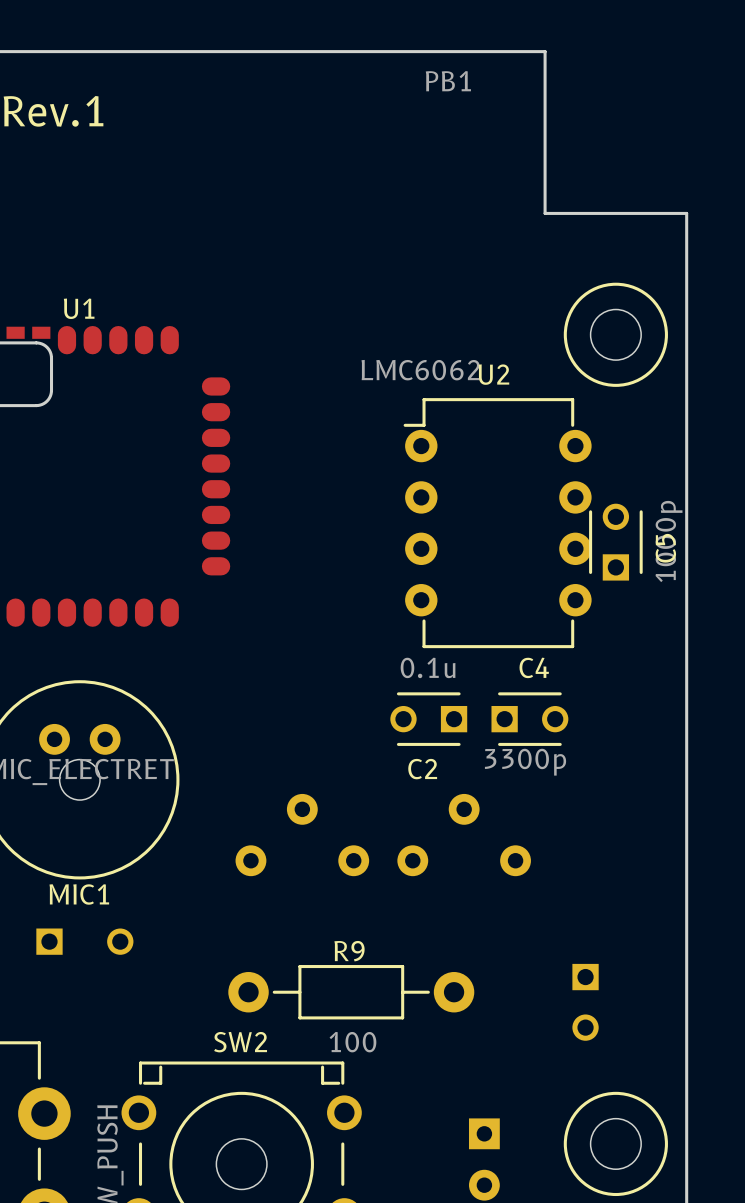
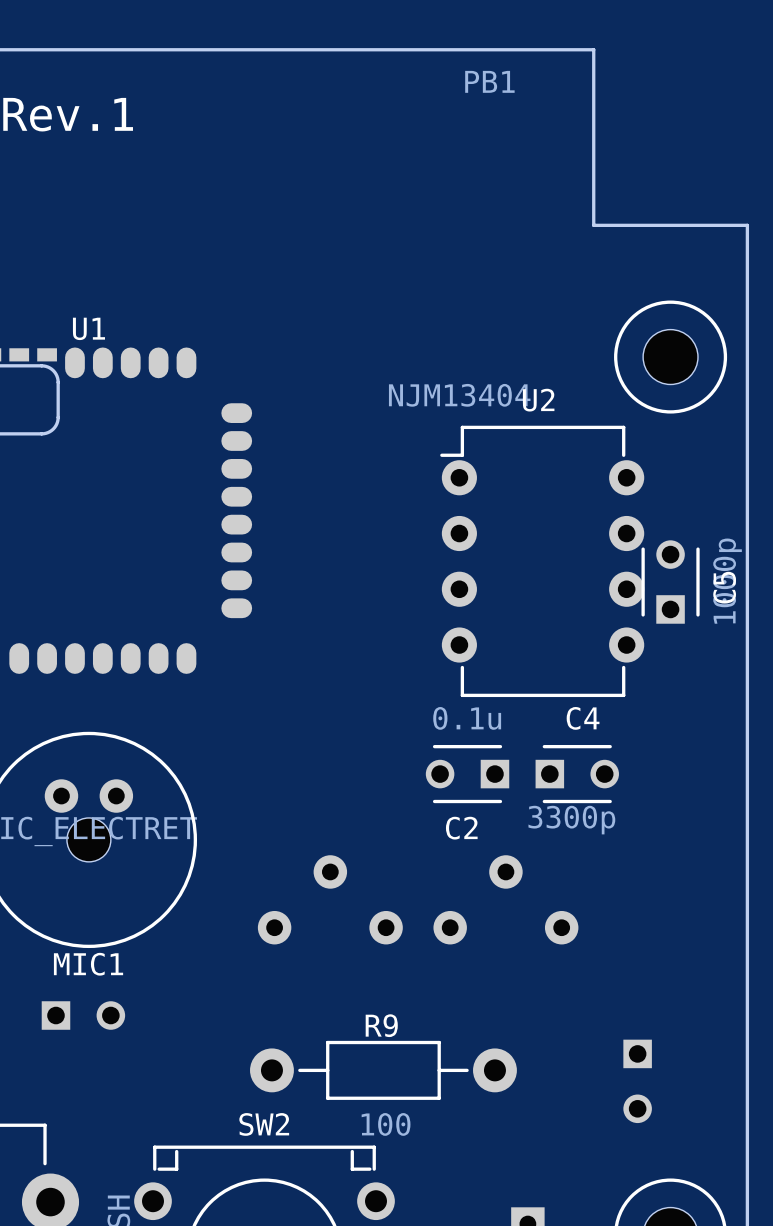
U2 value: LMC6062 (420, 370) -> NJM13404 (459, 395)
part footprint: [36, 928, 134, 955] -> [41, 1001, 126, 1030]

